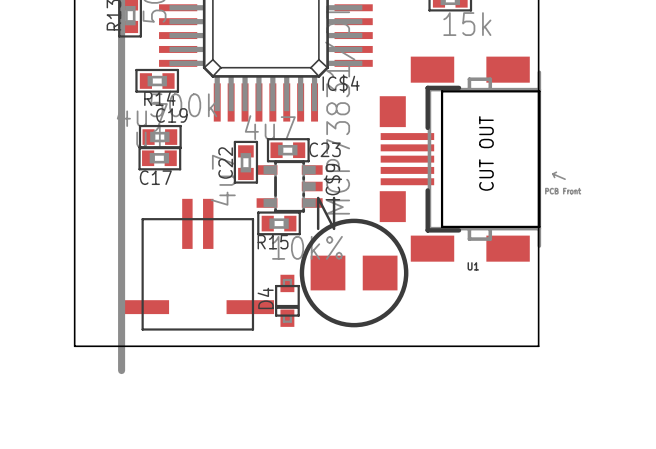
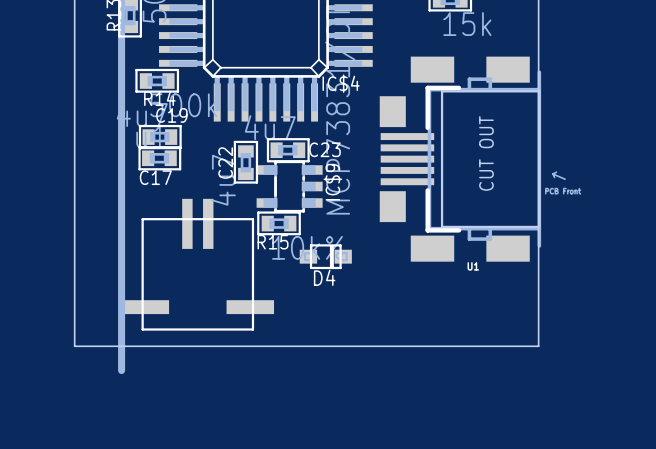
part: (354, 273) -> none
D4 rotation: 0° (287, 300) -> 90° counterclockwise (325, 256)
D4 position: (287, 300) -> (325, 256)

